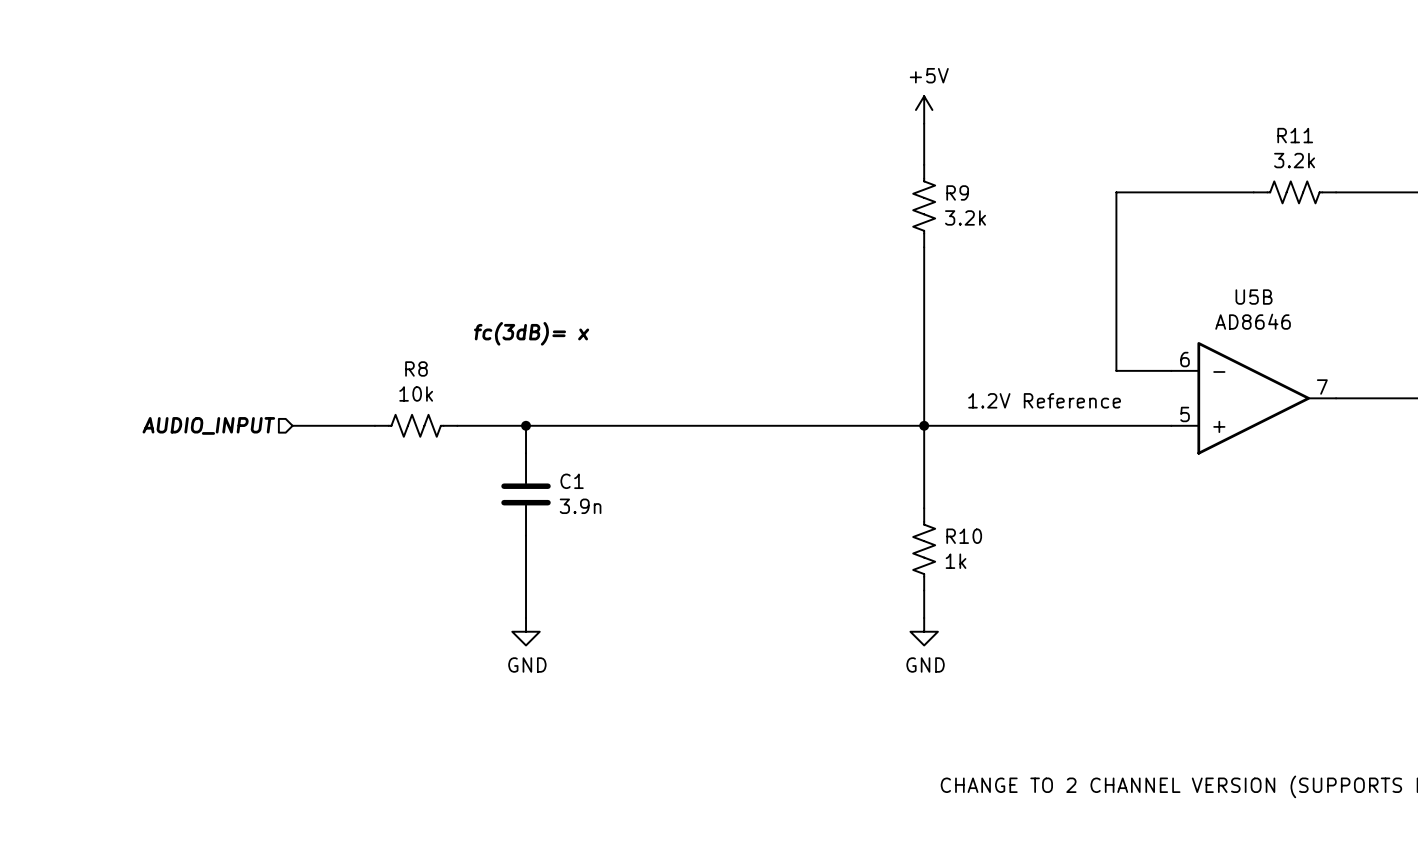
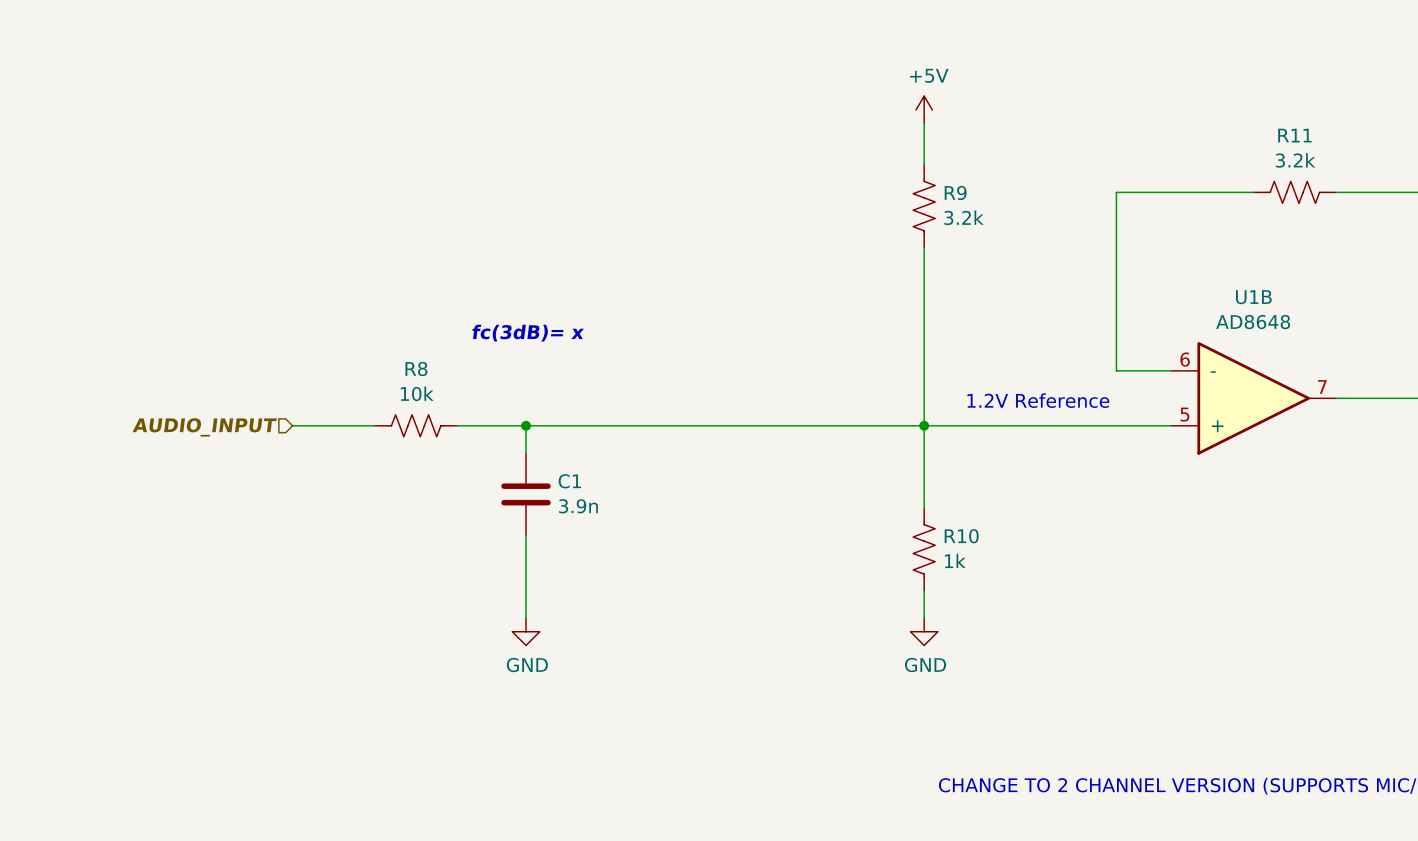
U5B name: U5B (1254, 297) -> U1B (1253, 297)
U5B value: AD8646 (1253, 321) -> AD8648 (1253, 322)

